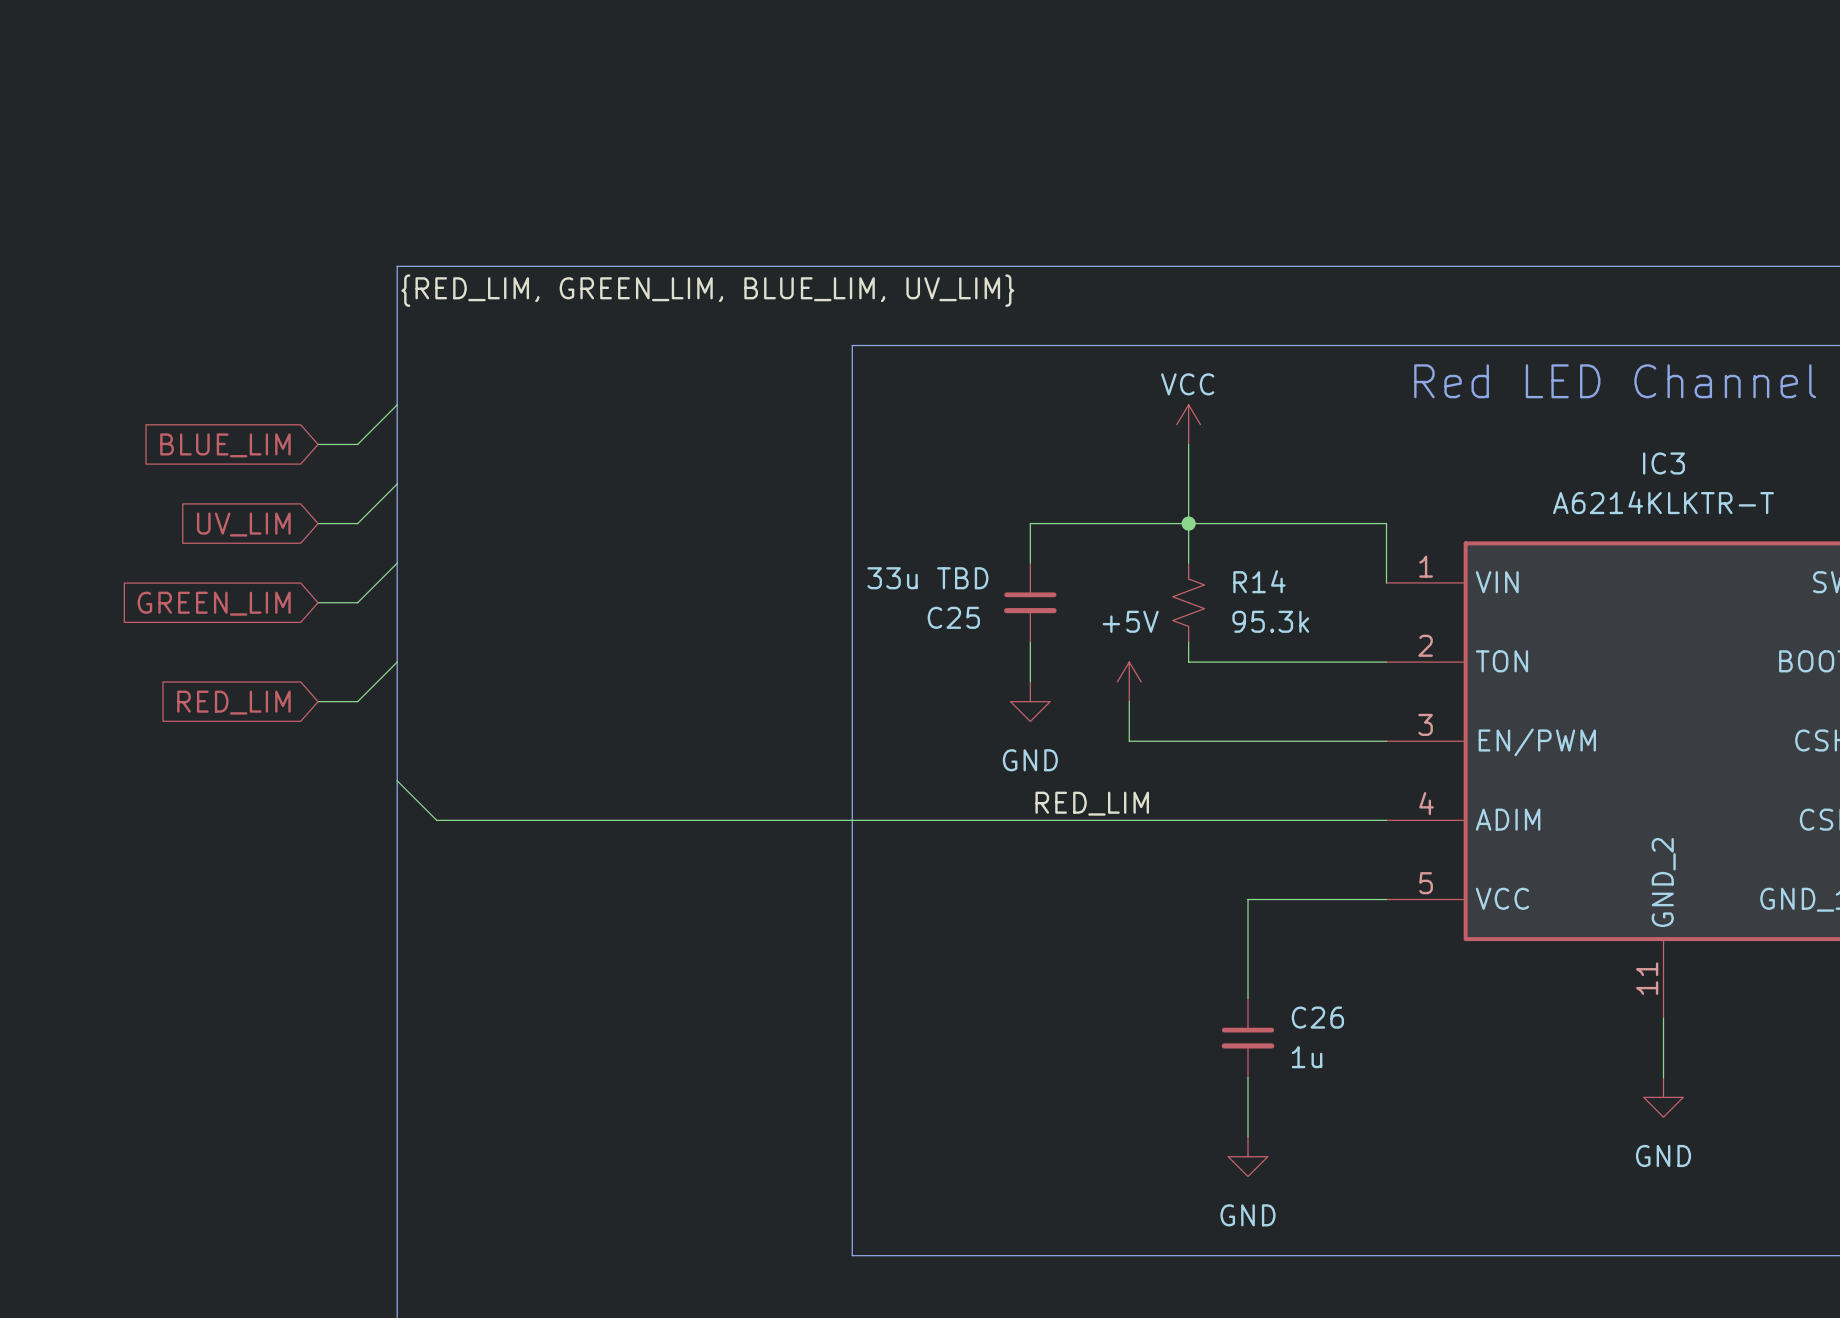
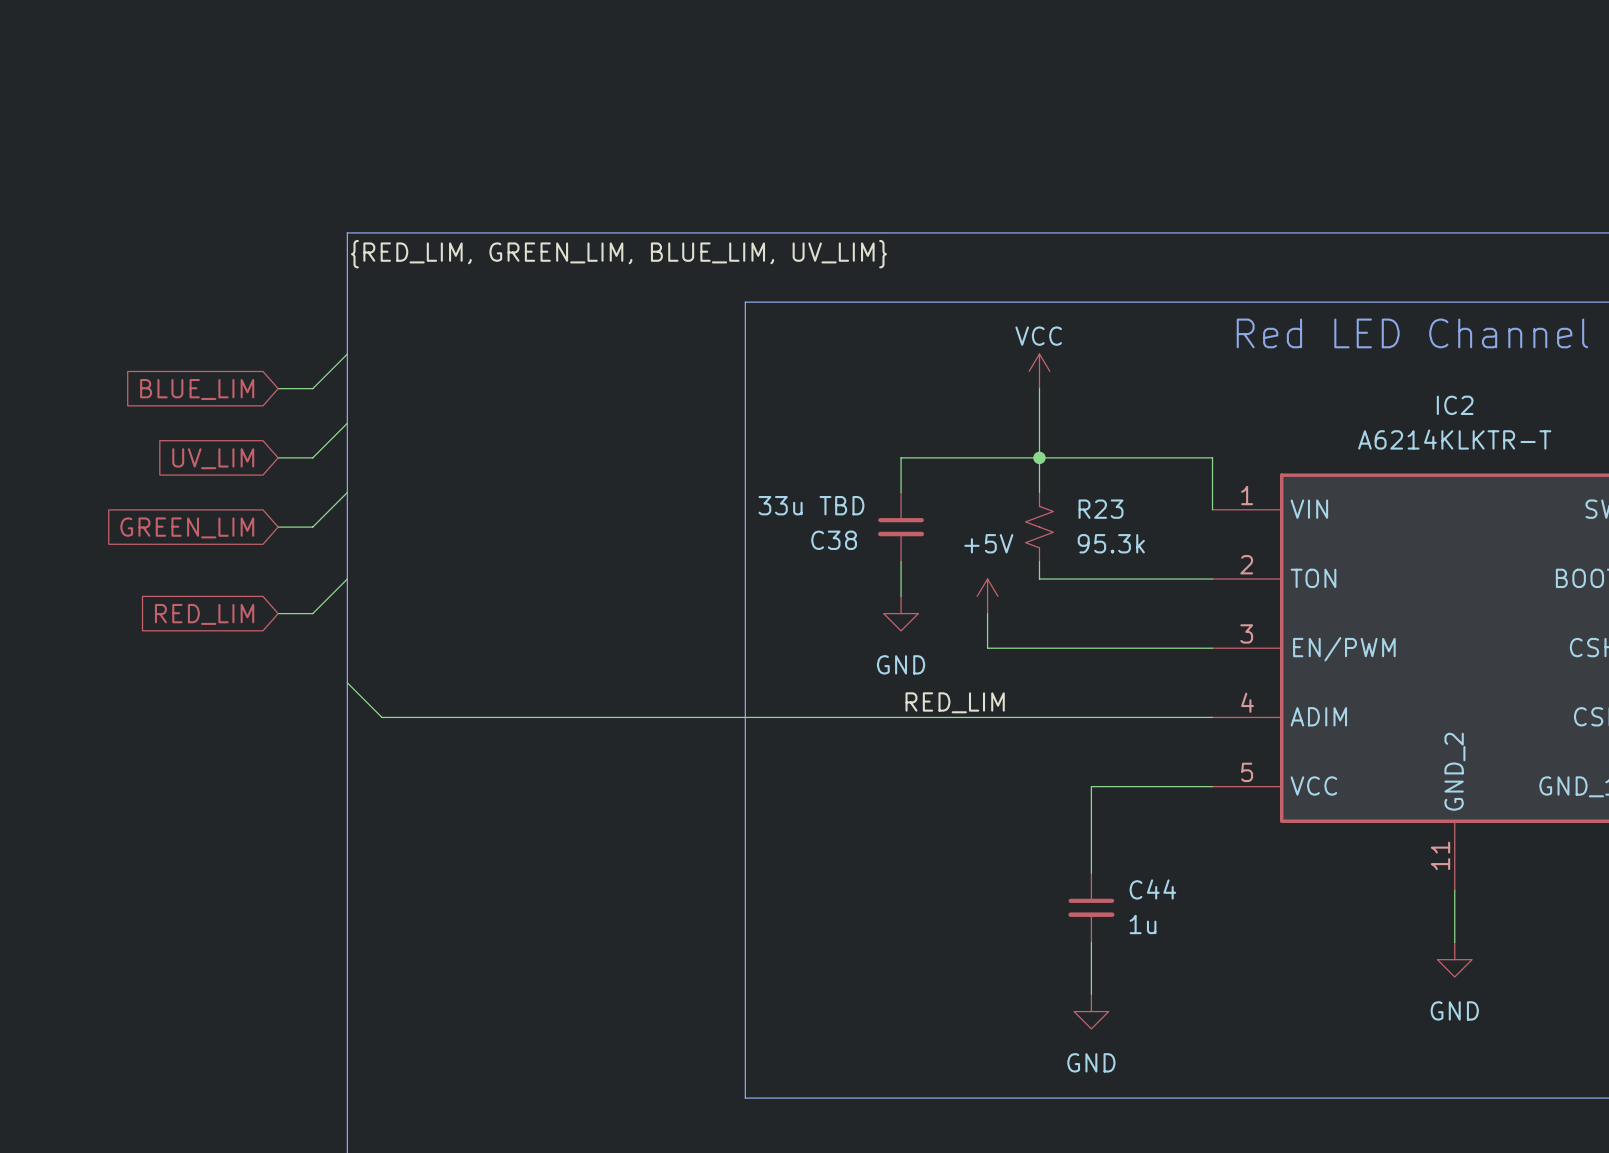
IC3 name: IC3 (1663, 463) -> IC2 (1455, 405)
R14 name: R14 (1259, 581) -> R23 (1101, 509)
C25 name: C25 (953, 617) -> C38 (834, 540)
C26 name: C26 (1317, 1017) -> C44 (1152, 889)

